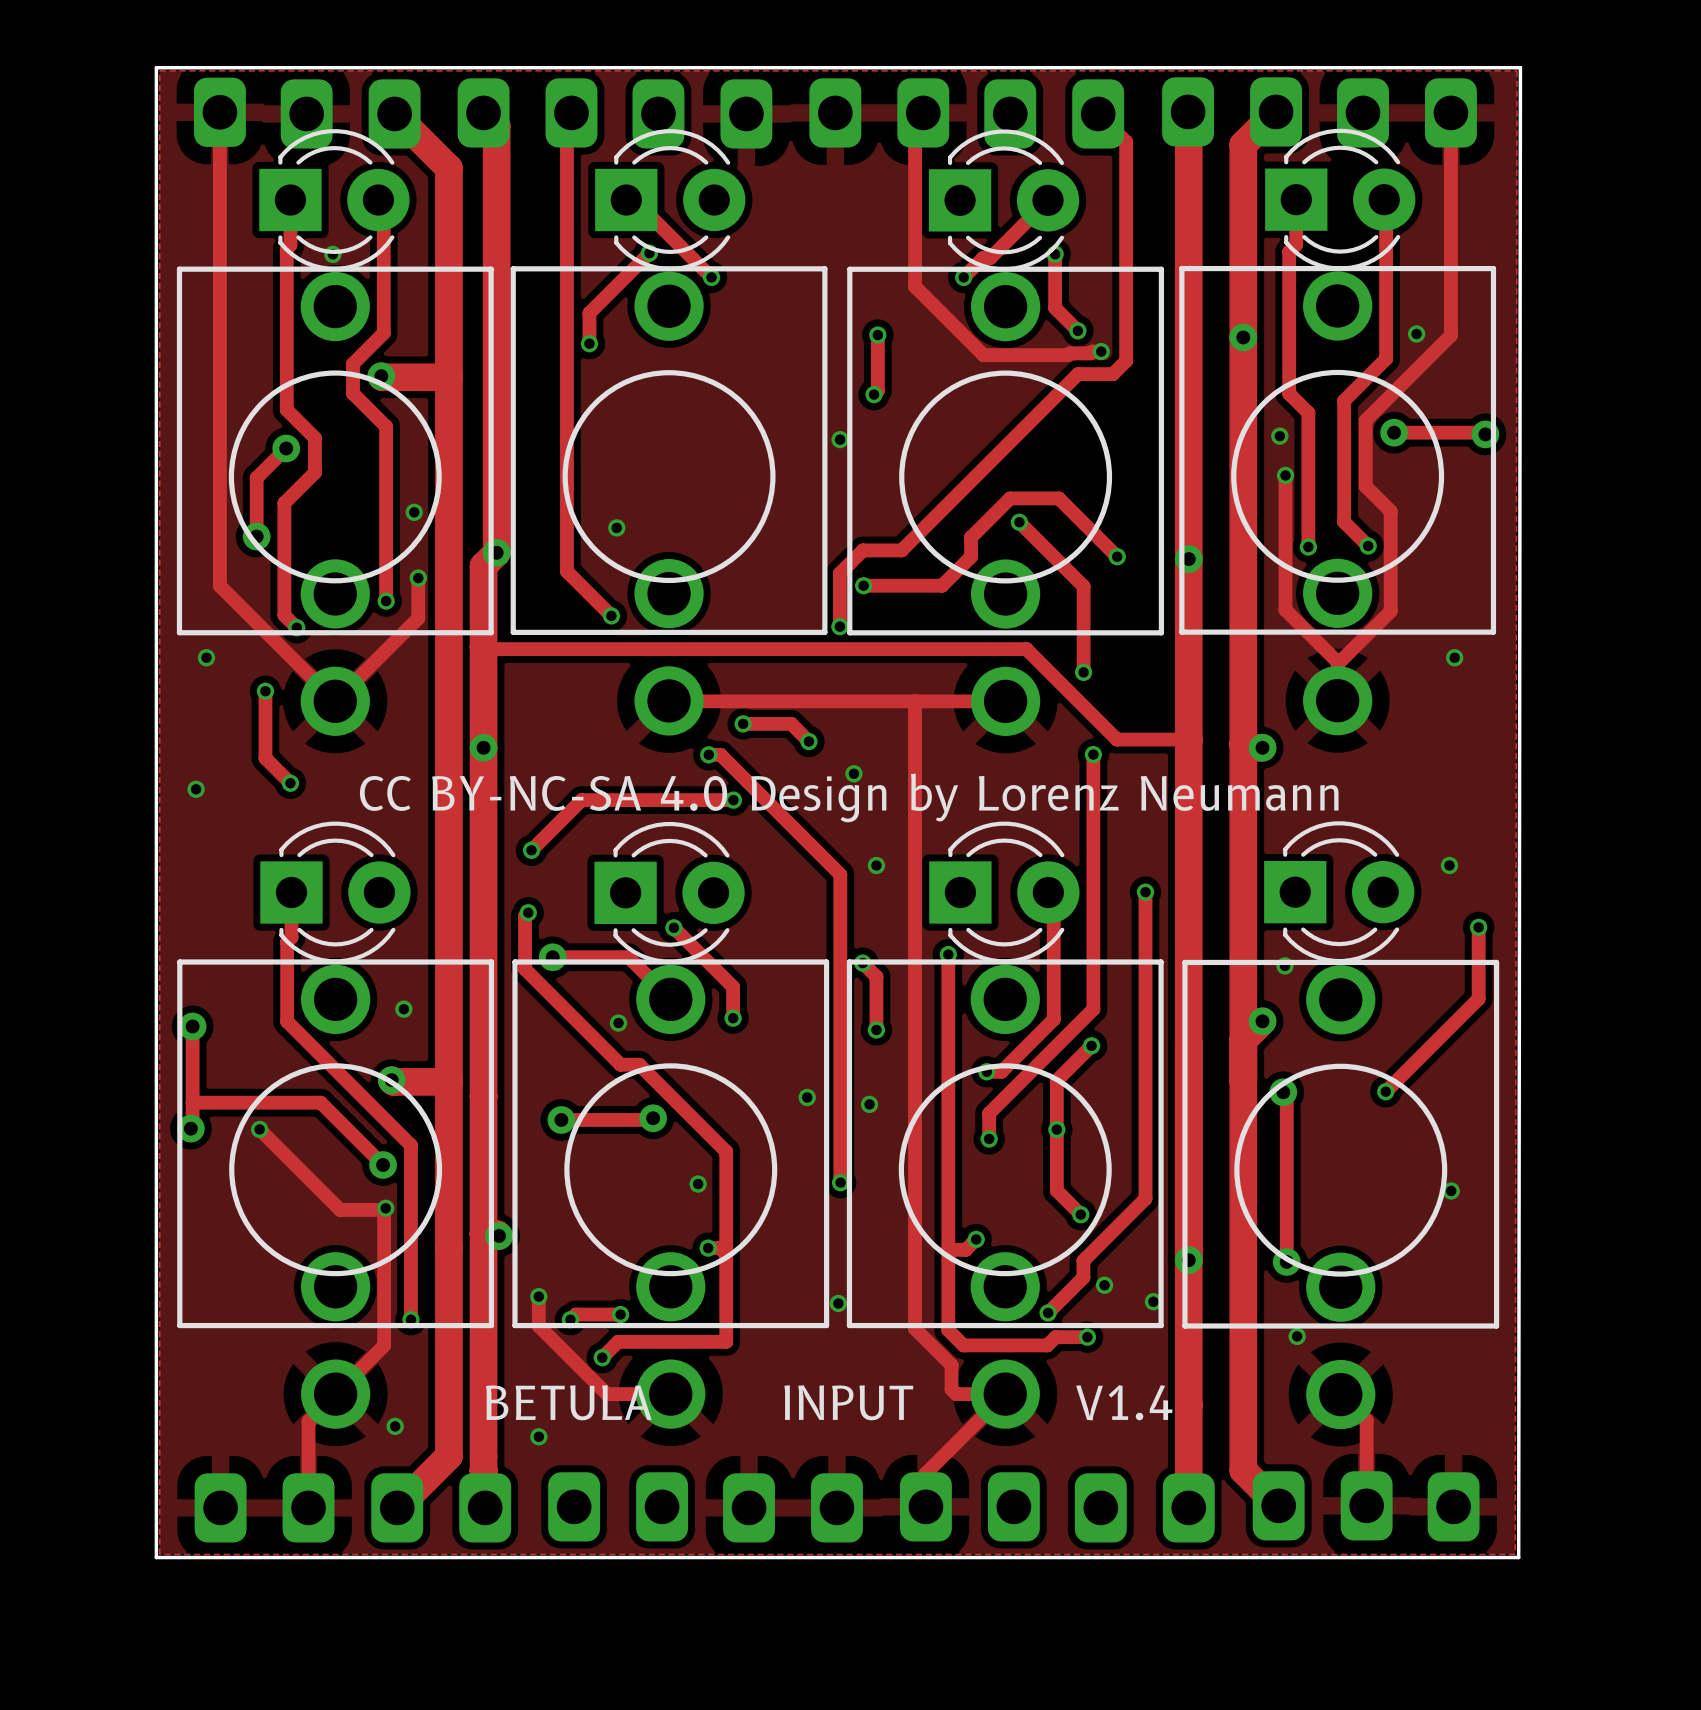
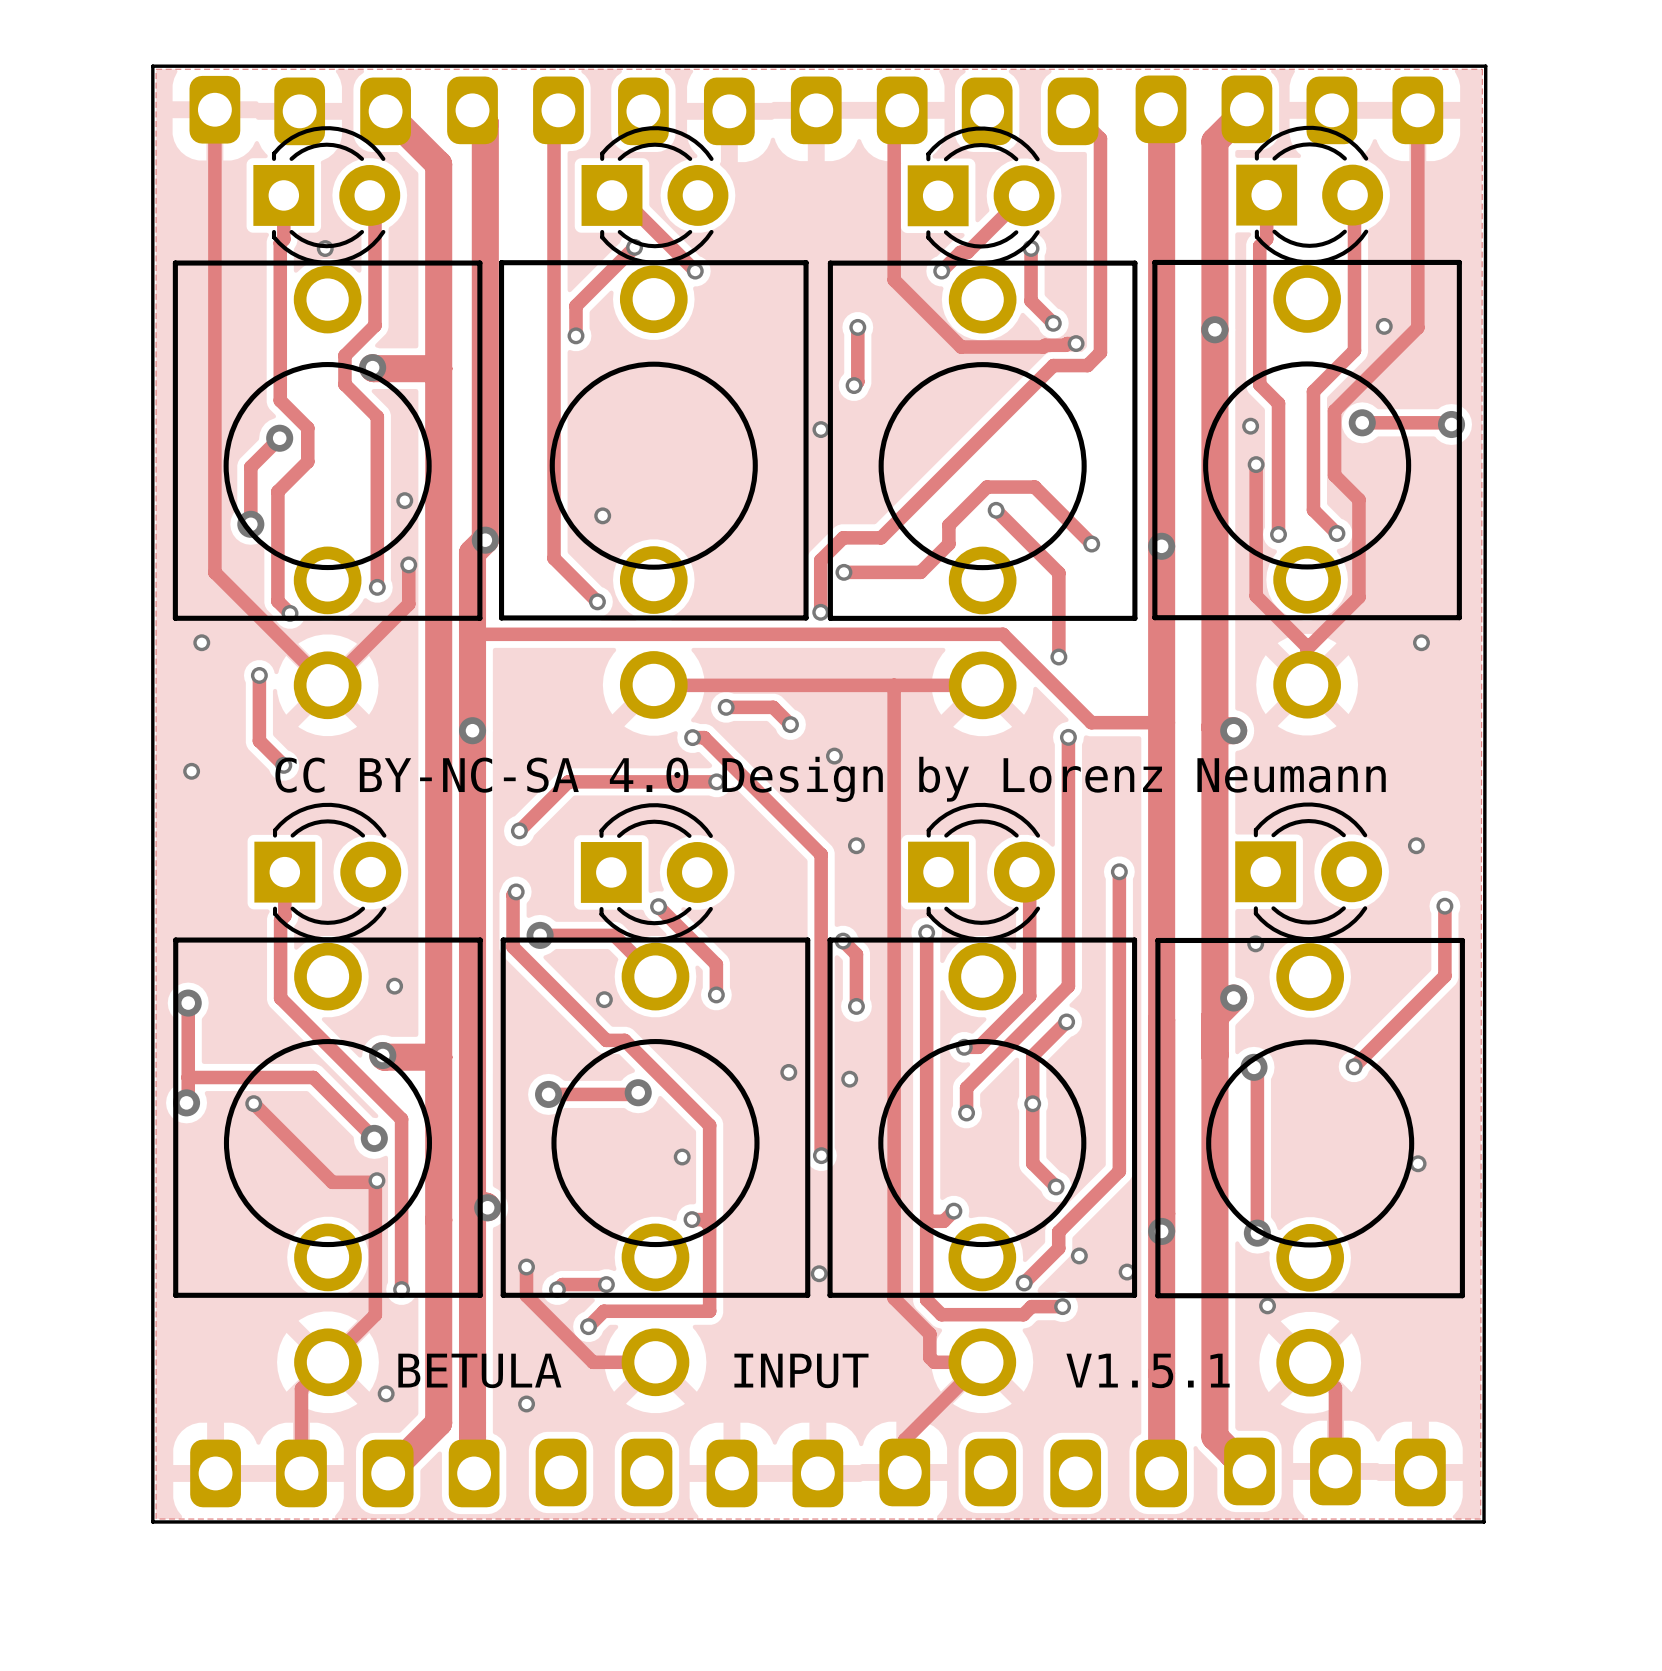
text: BETULA INPUT V1.4 (829, 1402) -> BETULA INPUT V1.5.1 (813, 1370)

